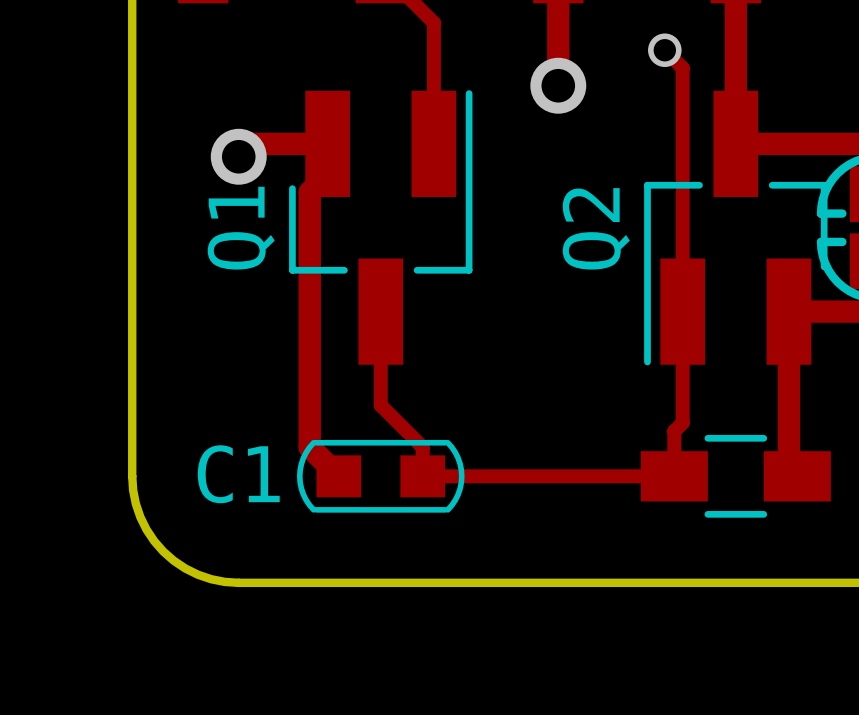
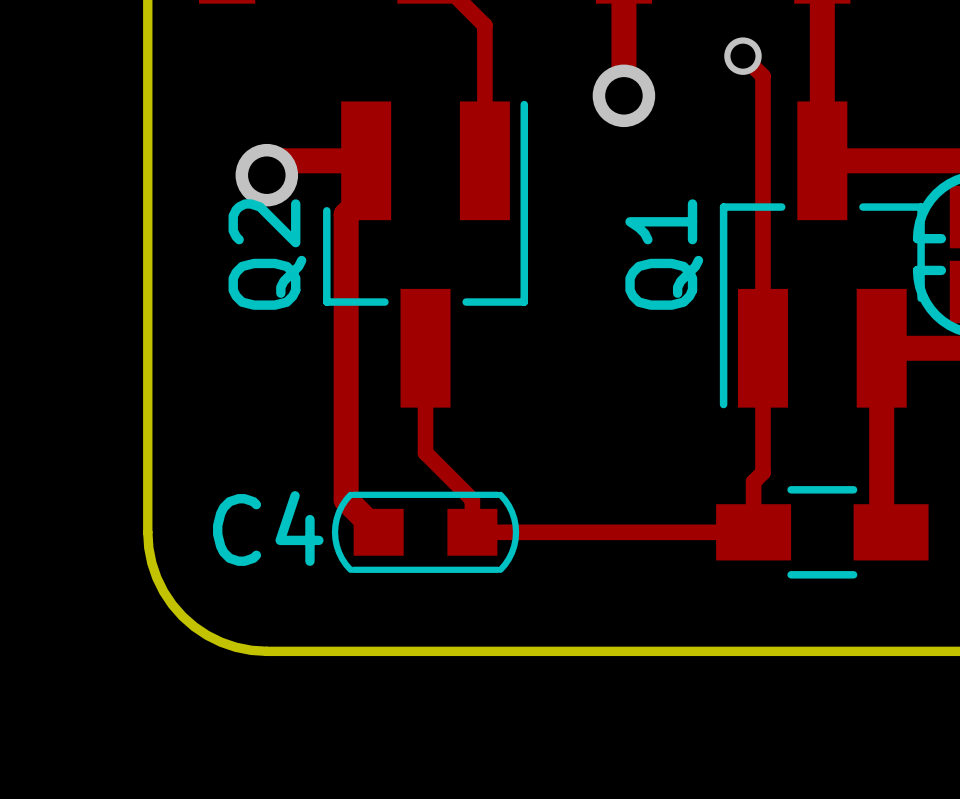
Q1 name: Q1 (241, 228) -> Q2 (267, 254)
Q2 name: Q2 (596, 228) -> Q1 (664, 254)
C1 name: C1 (238, 474) -> C4 (268, 528)

